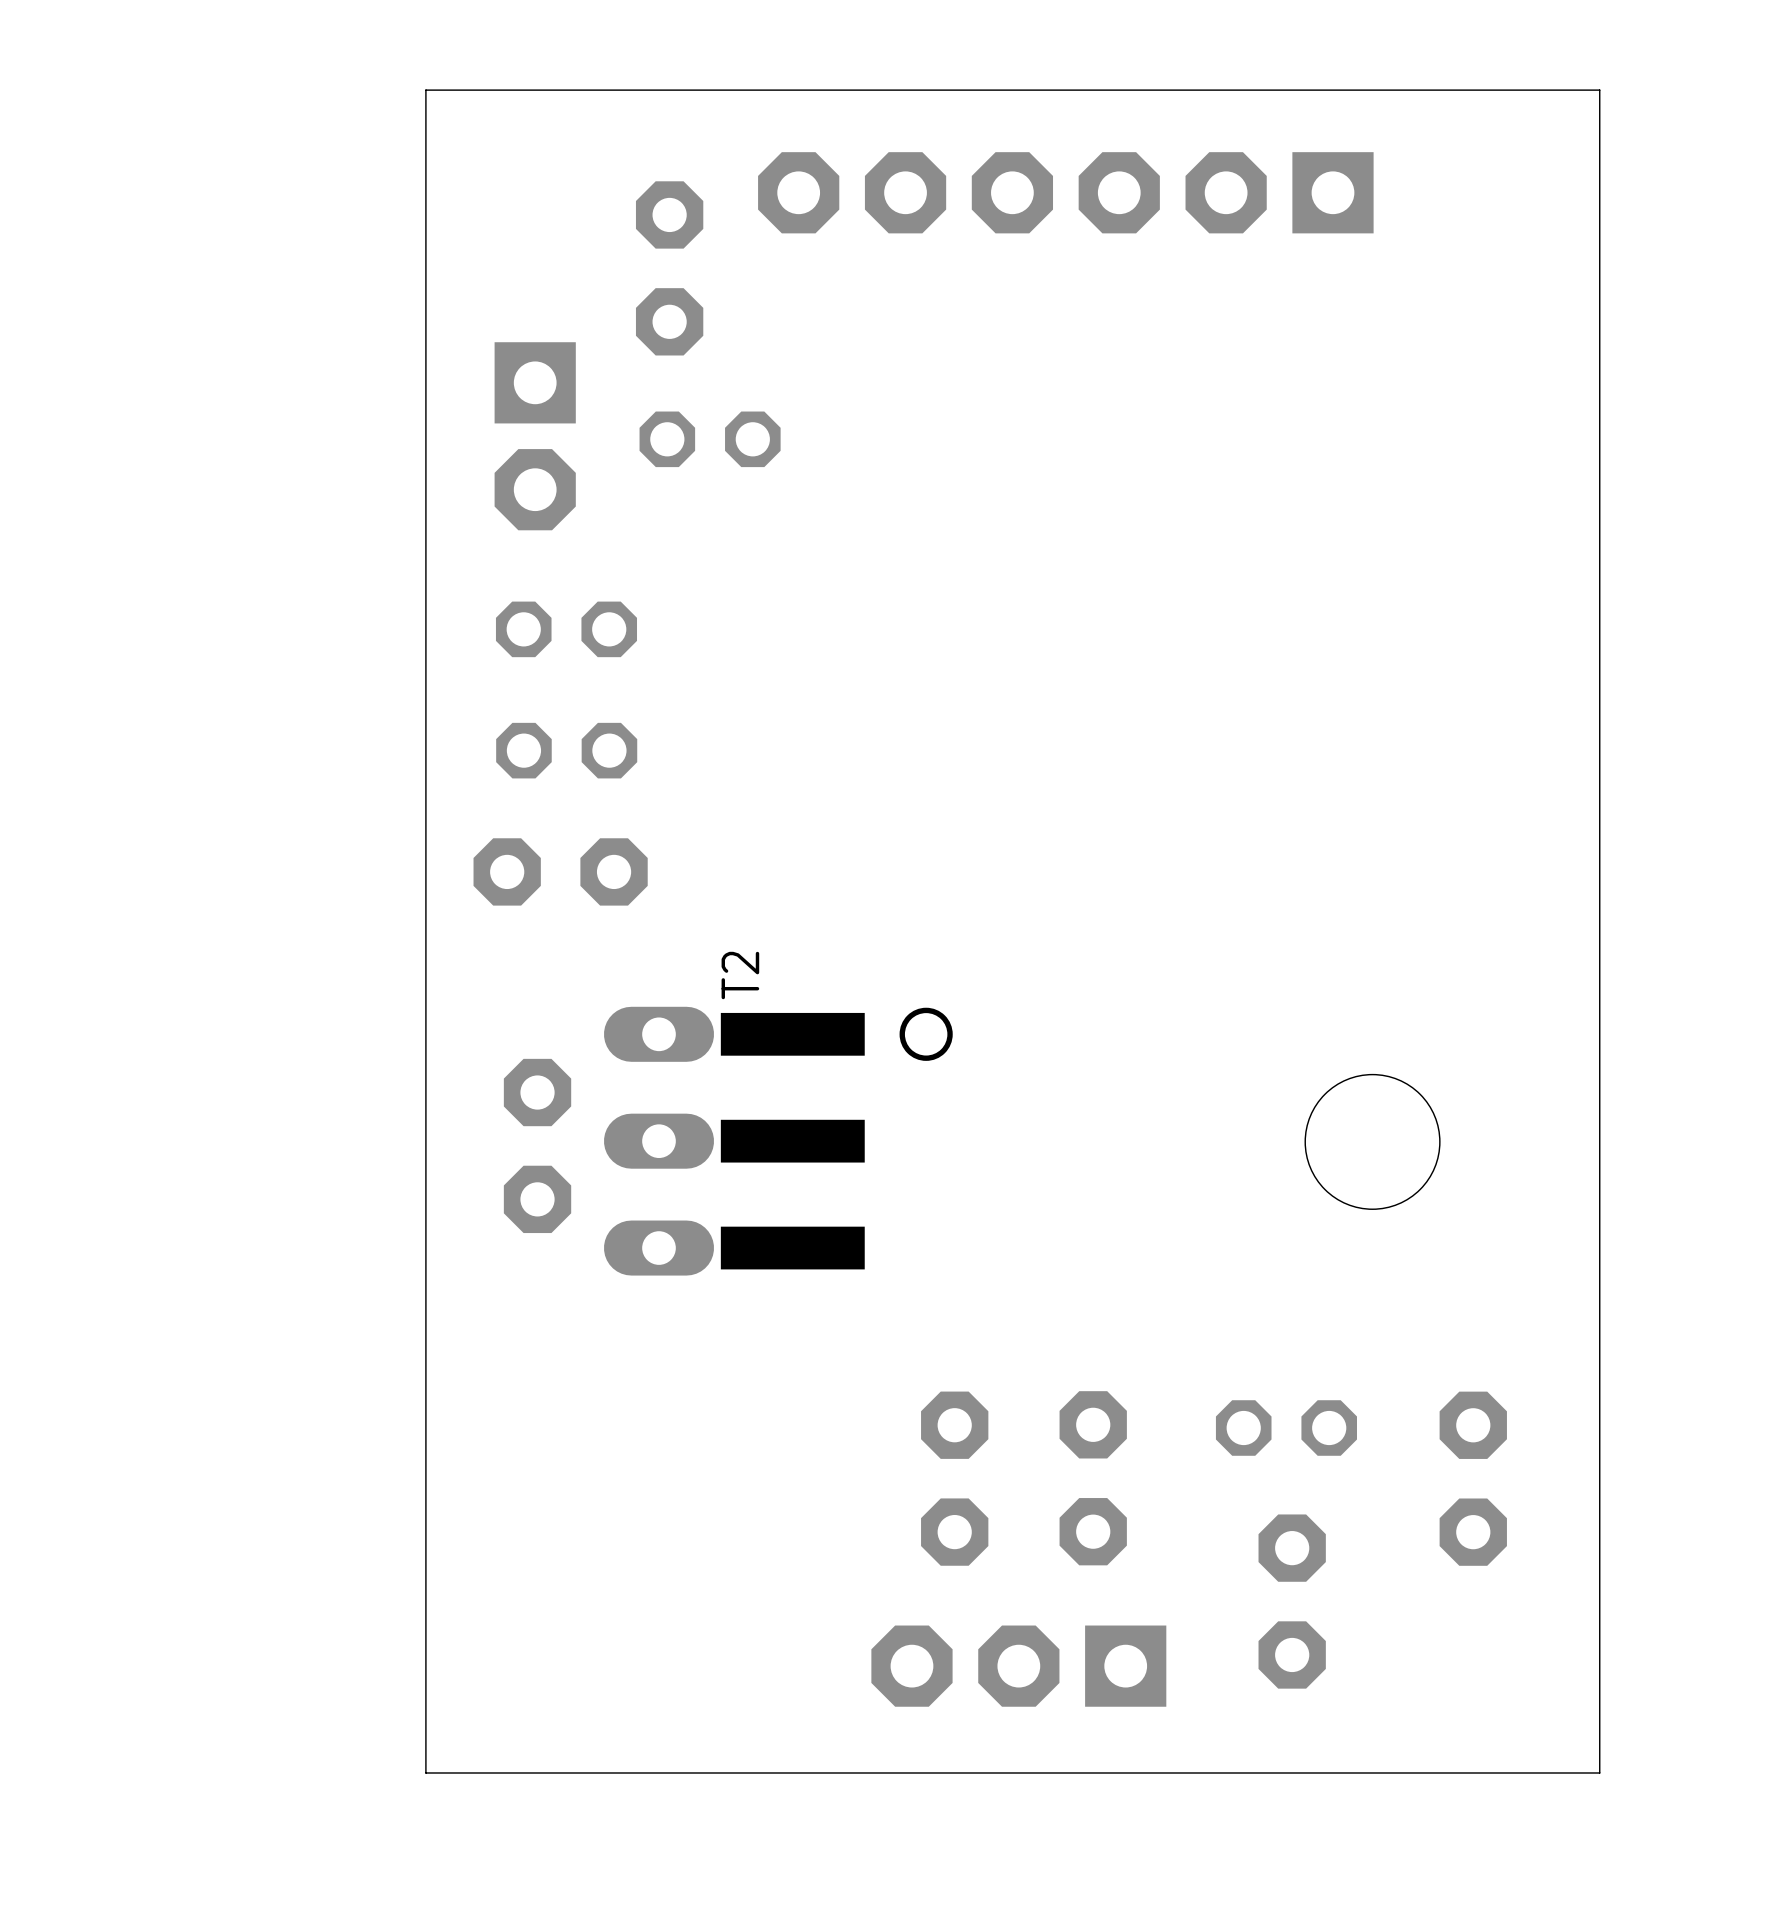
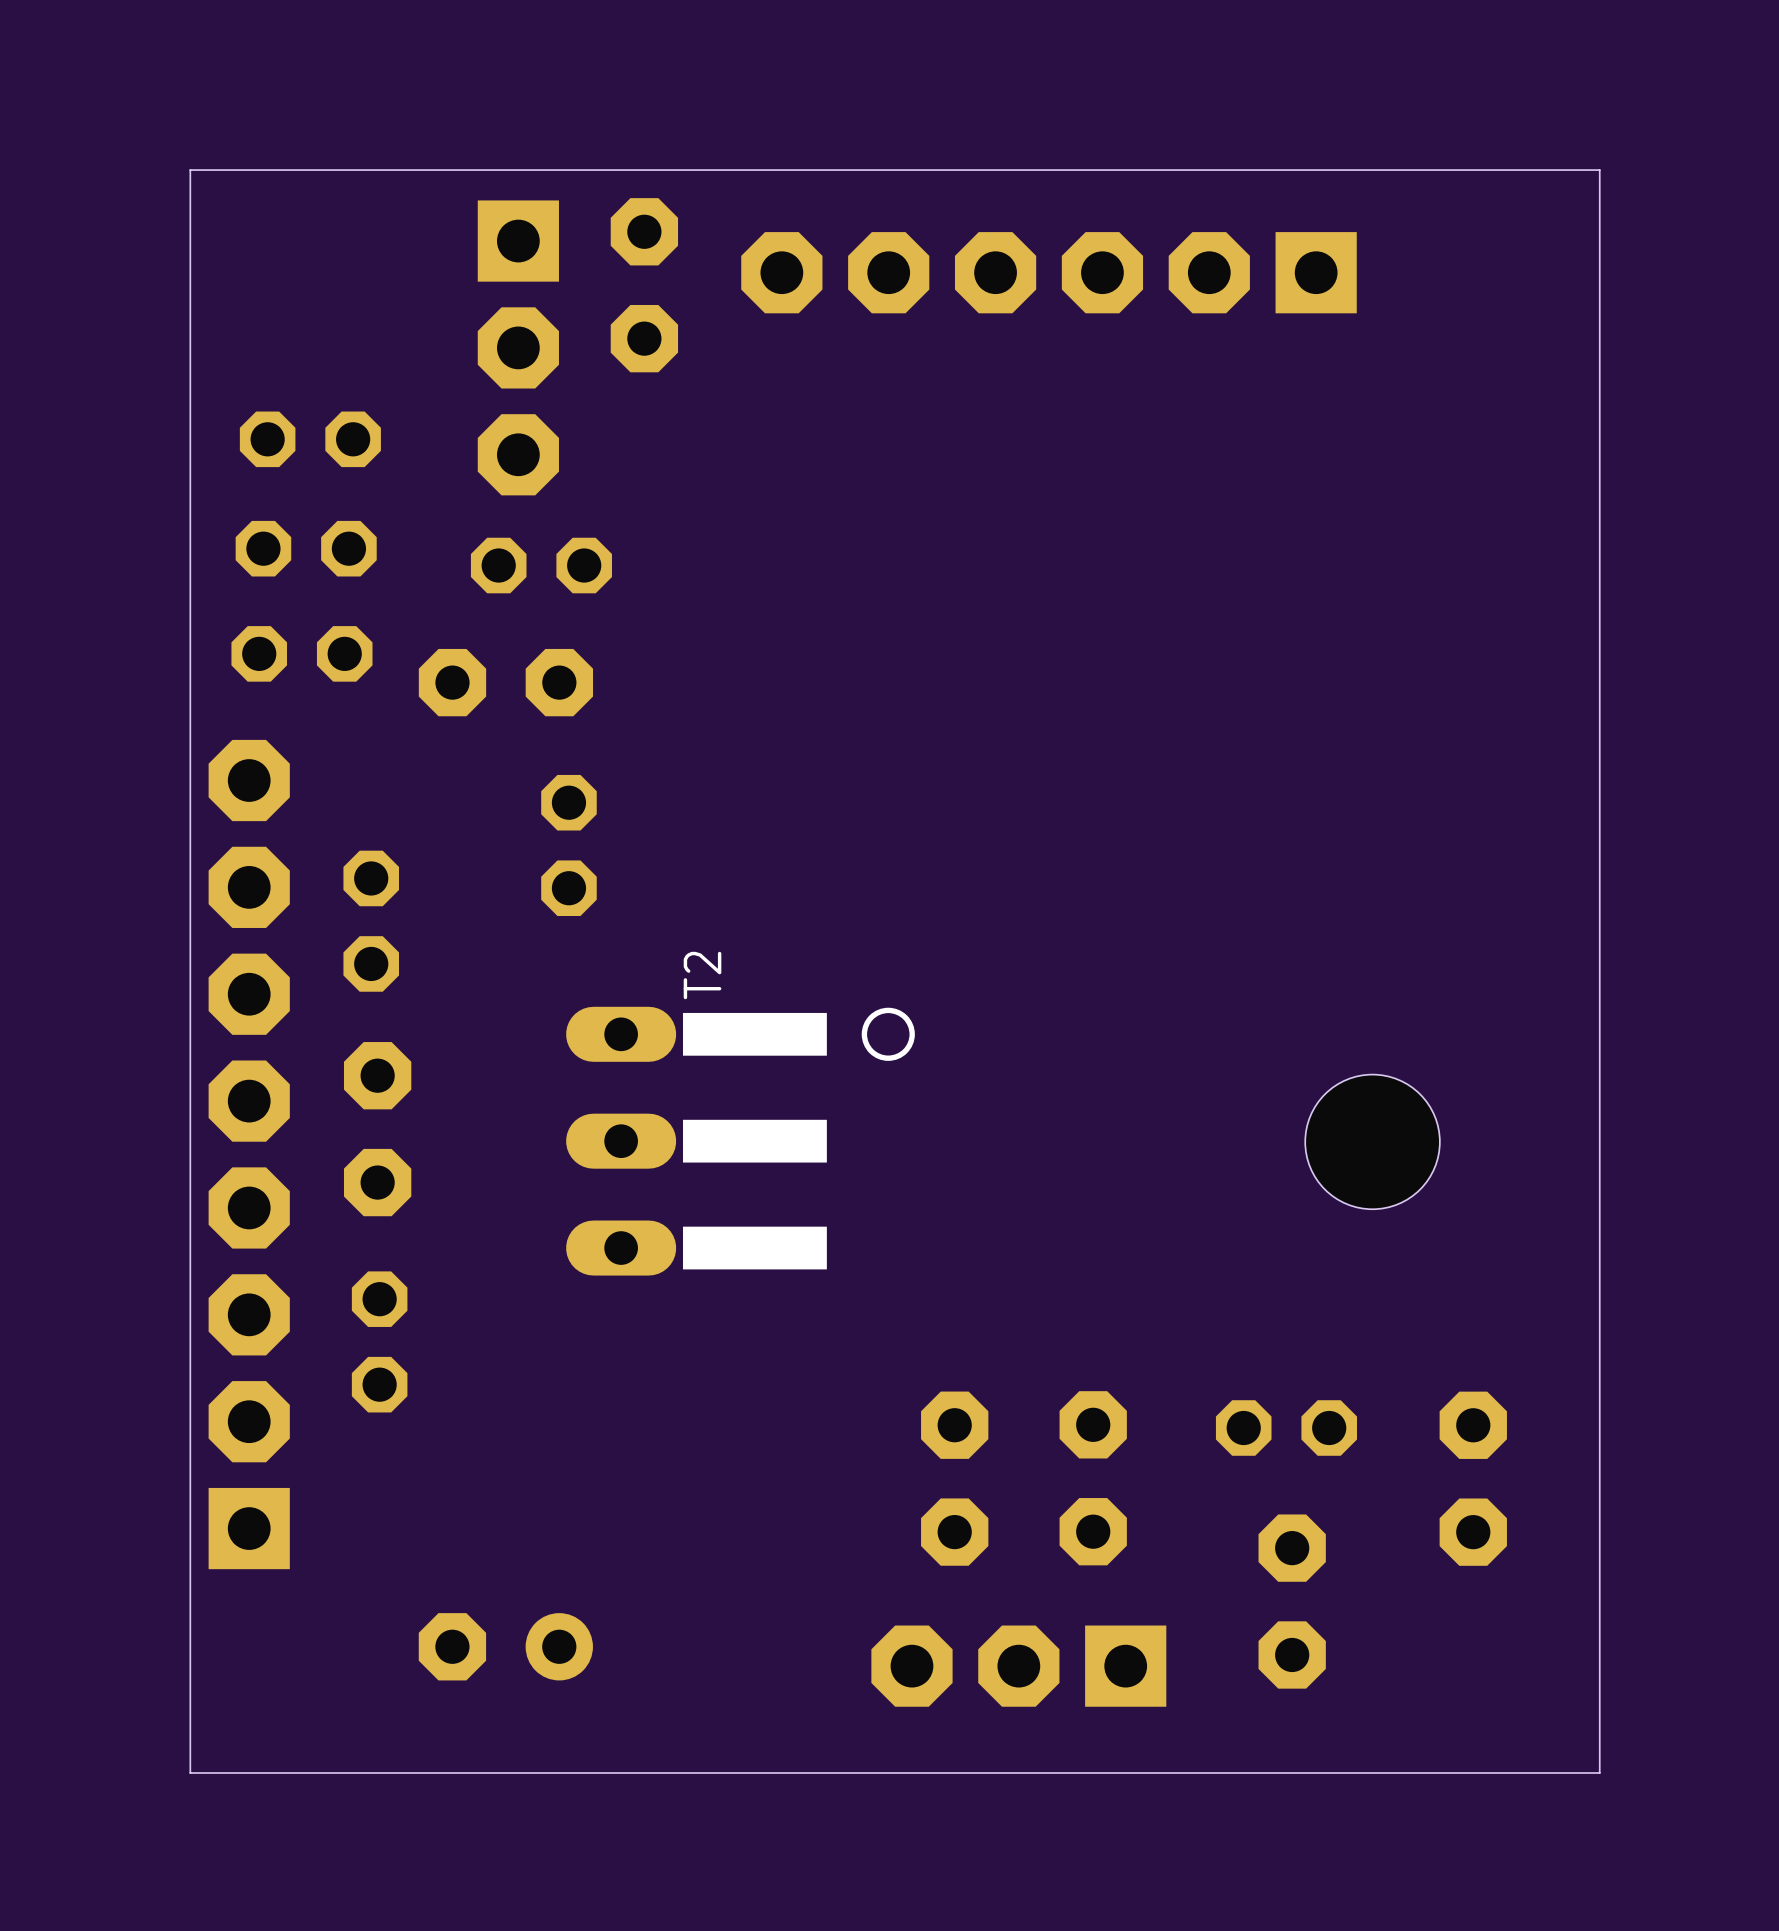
board edge: (1599, 170) (1599, 90) (425, 90) (425, 1772) -> (1599, 170) (190, 170) (190, 1772) (425, 1772)
part position: (1065, 192) -> (1049, 272)
part position: (669, 268) -> (644, 285)
part: none -> (518, 347)
part: (535, 436) -> none
part: none -> (310, 439)
part: (710, 439) -> none
part: none -> (306, 548)
part position: (566, 629) -> (541, 565)
part: none -> (301, 653)
part: none -> (505, 682)
part: (566, 750) -> none
part footprint: [473, 838, 648, 906] -> [541, 774, 597, 917]
part: none -> (371, 921)
T2 position: (778, 1141) -> (740, 1141)
part position: (537, 1145) -> (377, 1129)
part: none -> (249, 1154)
part: none -> (379, 1341)
part: none -> (505, 1646)

